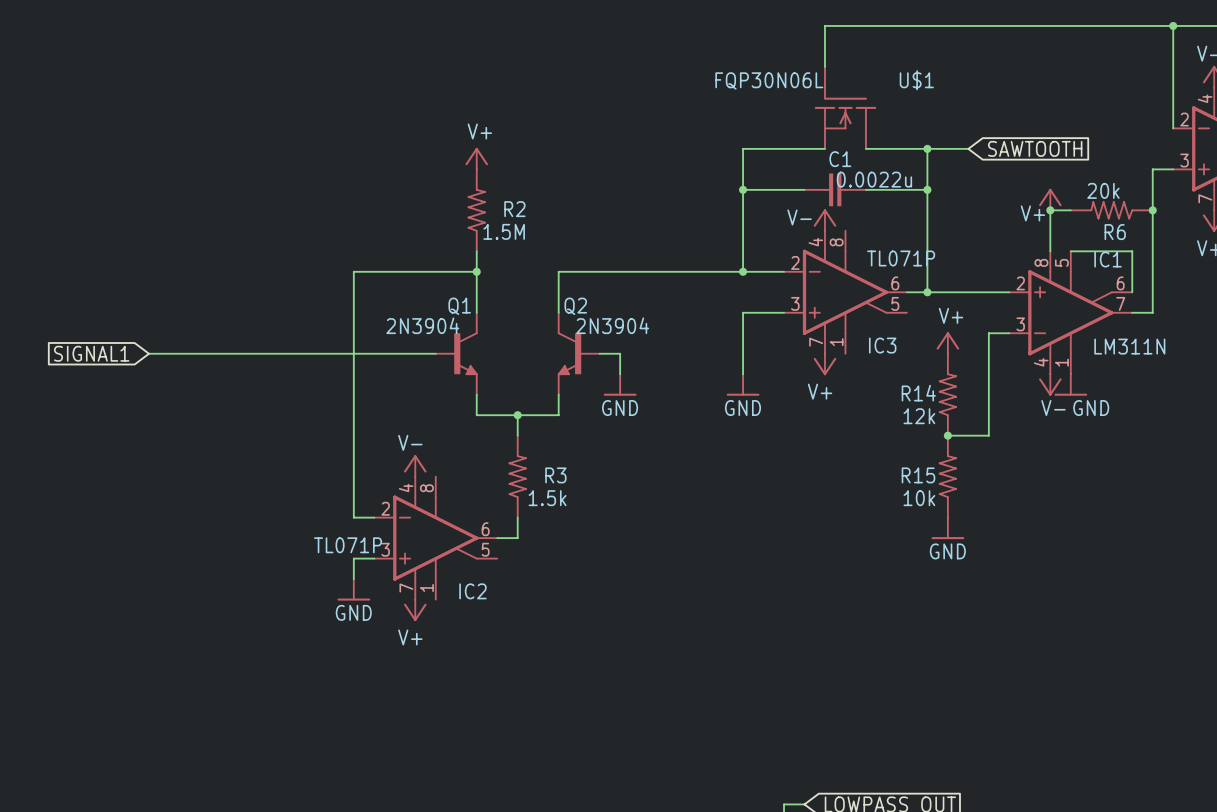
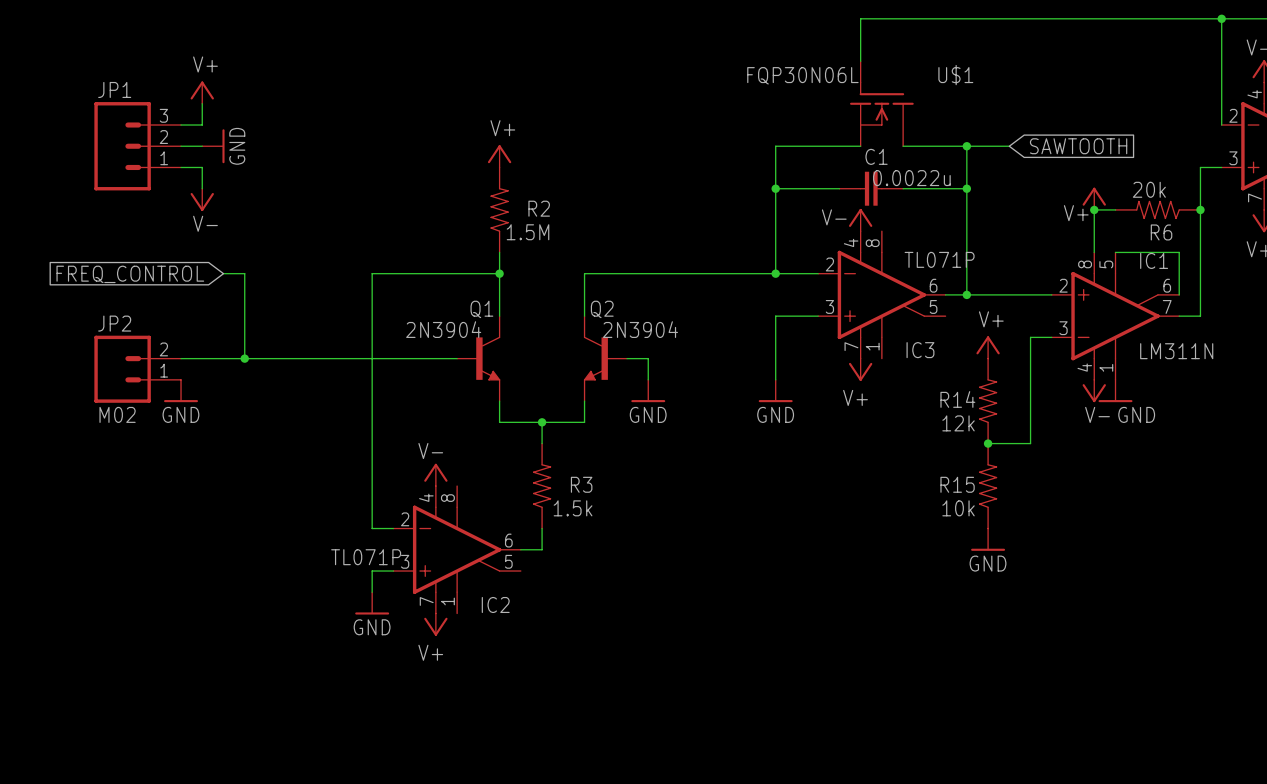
power symbol: none -> V+ (202, 92)
wire: none -> (202, 103) (202, 125) (181, 125)
JP1: none -> (137, 146)
wire: none -> (181, 146) (202, 146)
power symbol: none -> GND (213, 146)
wire: none -> (181, 167) (202, 167) (202, 188)
power symbol: none -> V- (202, 199)
wire: none -> (223, 273) (244, 273) (244, 358)
global label: none -> FREQ_CONTROL (130, 274)
global label: SIGNAL1 (91, 353) -> none
junction: none -> (244, 358)
JP2: none -> M02 (137, 369)
power symbol: none -> GND (181, 391)

